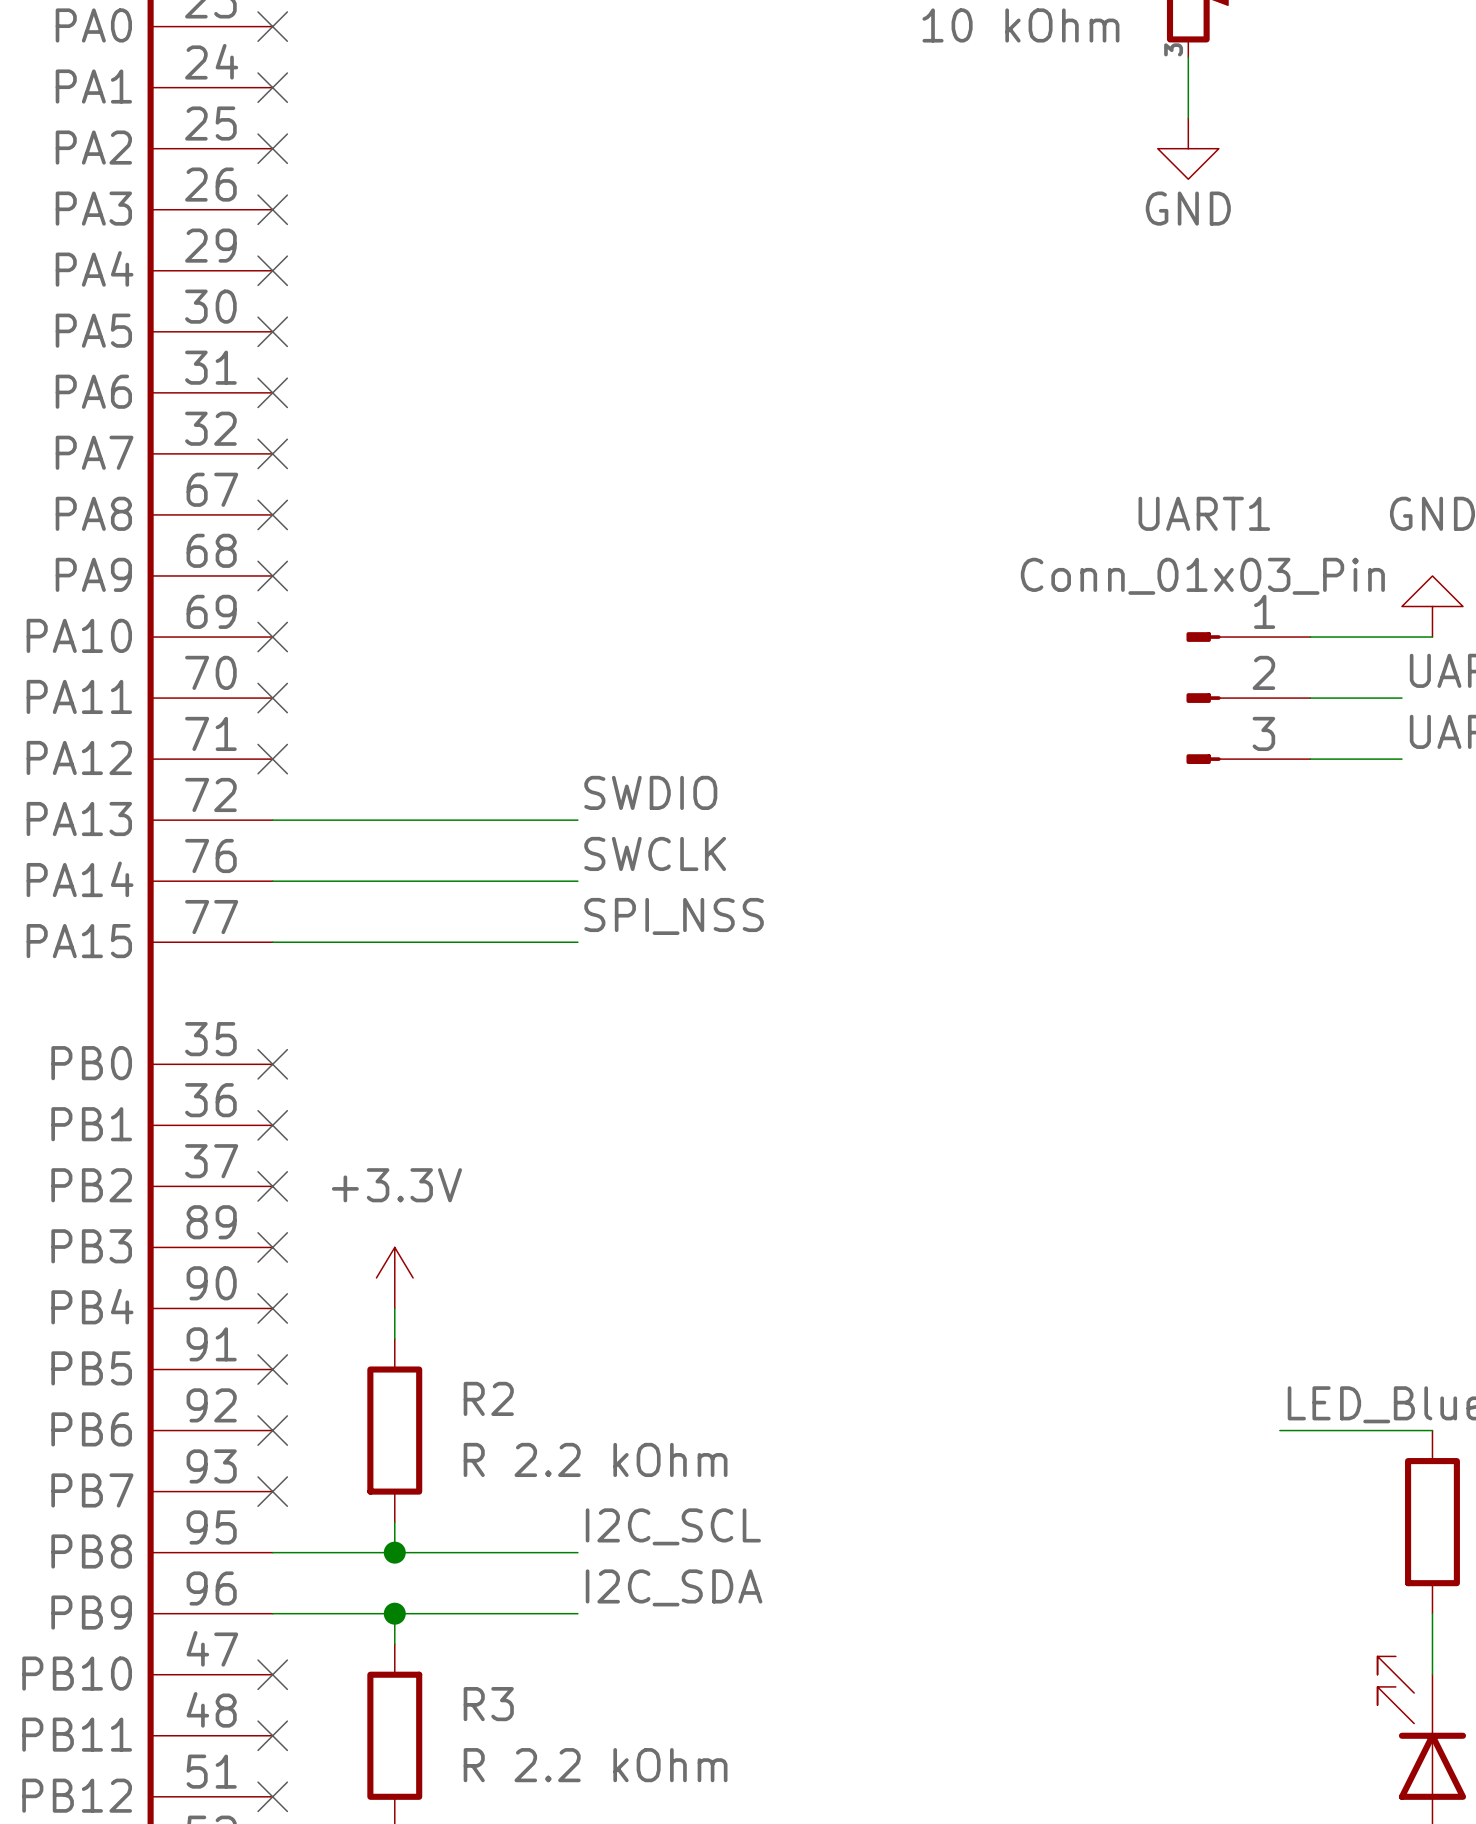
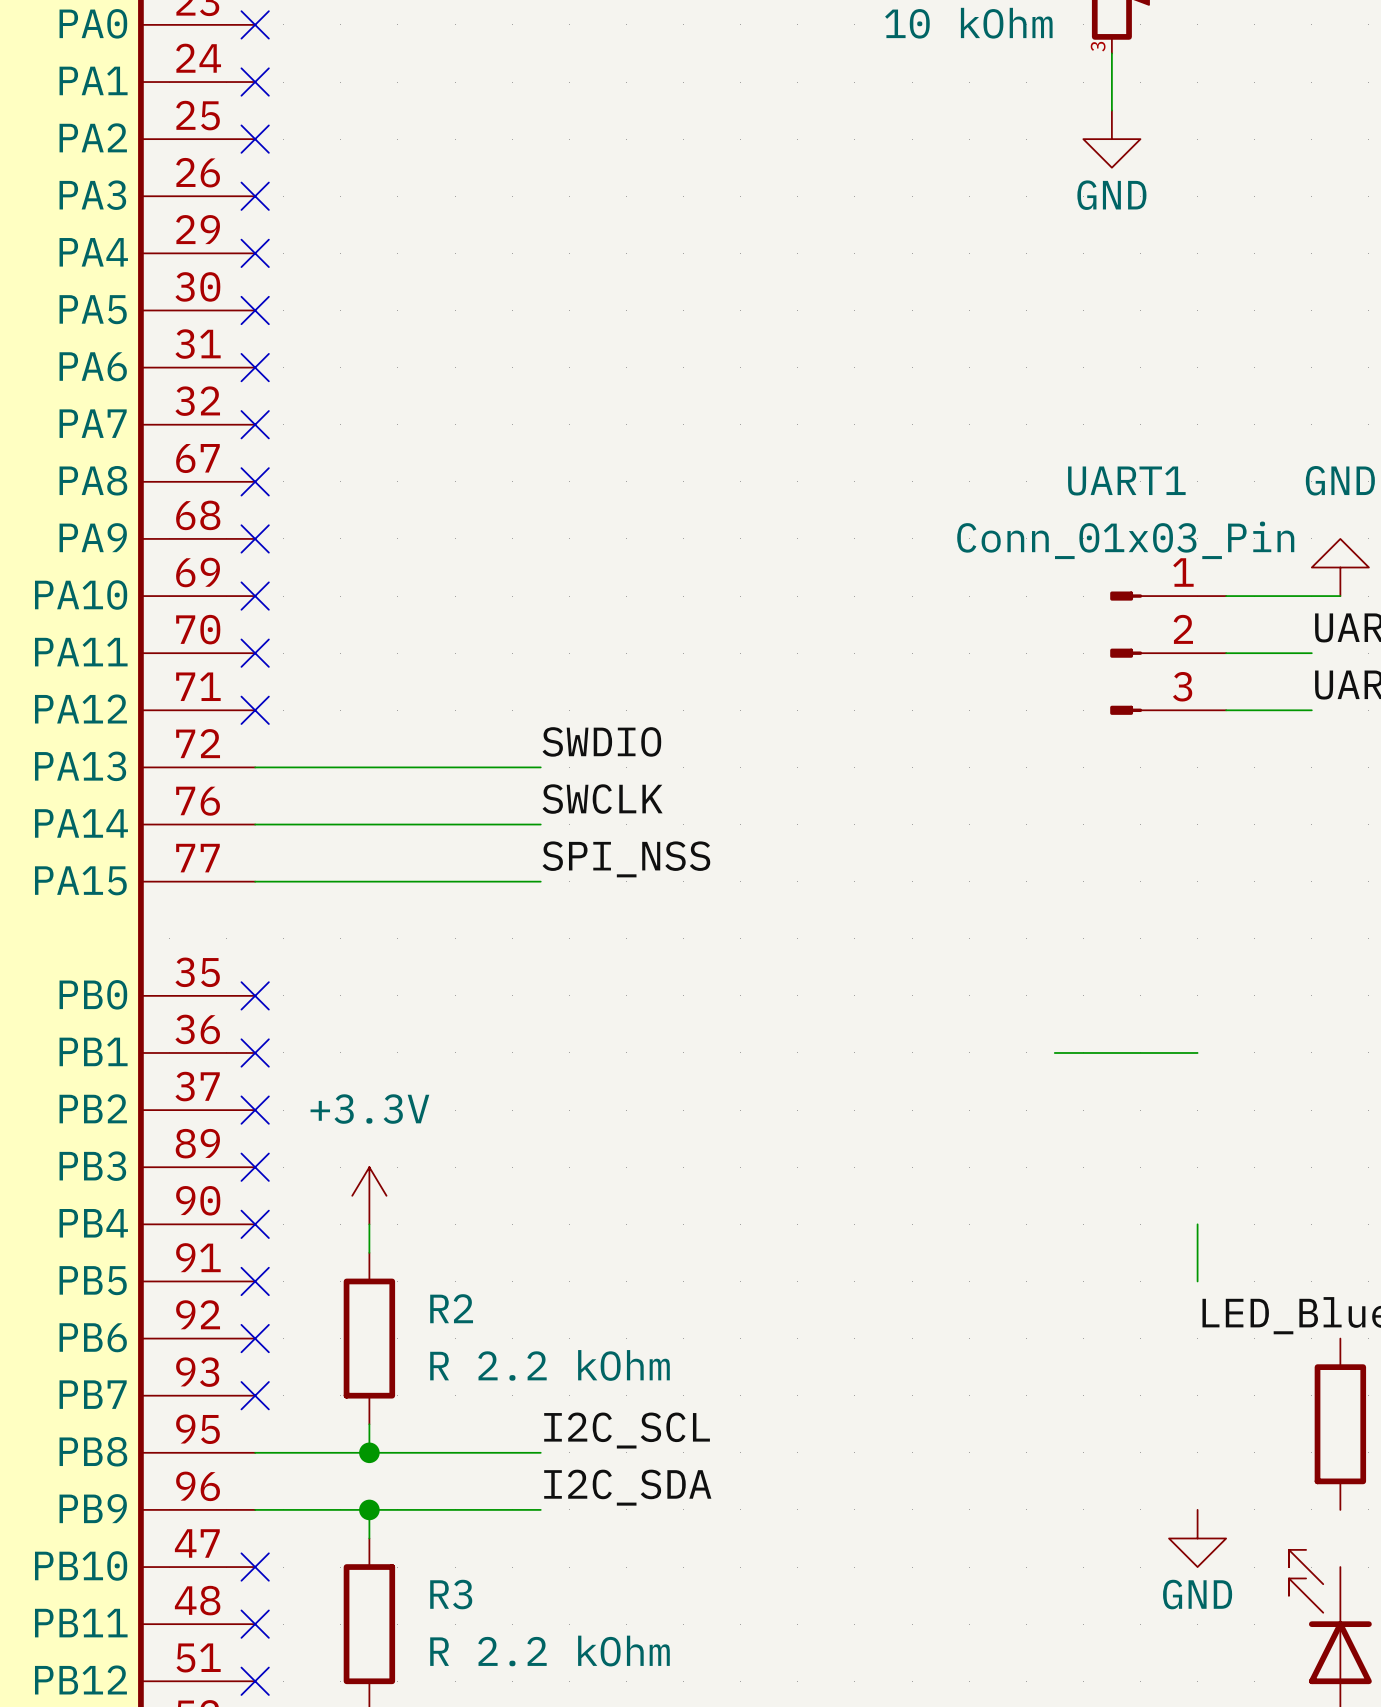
wire: (1279, 1430) (1432, 1430) -> (1054, 1052) (1197, 1052)
wire: (1432, 1613) (1432, 1674) -> (1197, 1224) (1197, 1281)
power symbol: none -> GND (1197, 1538)

